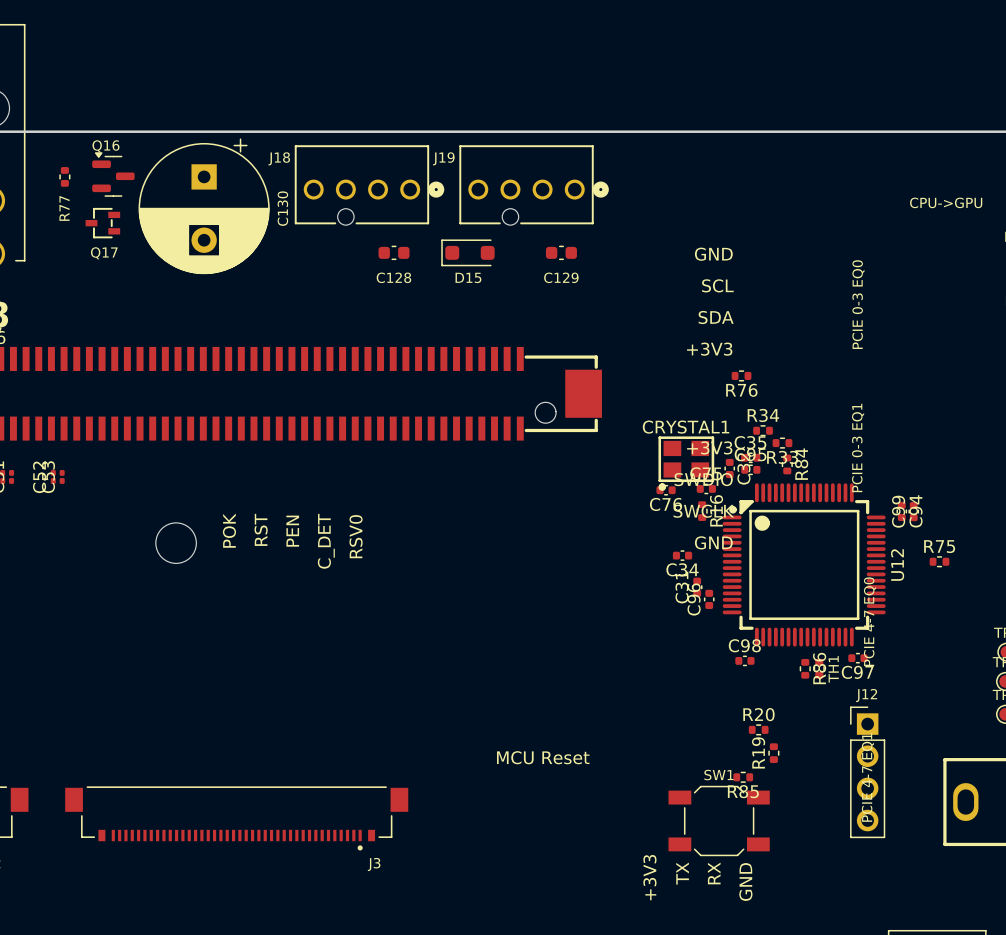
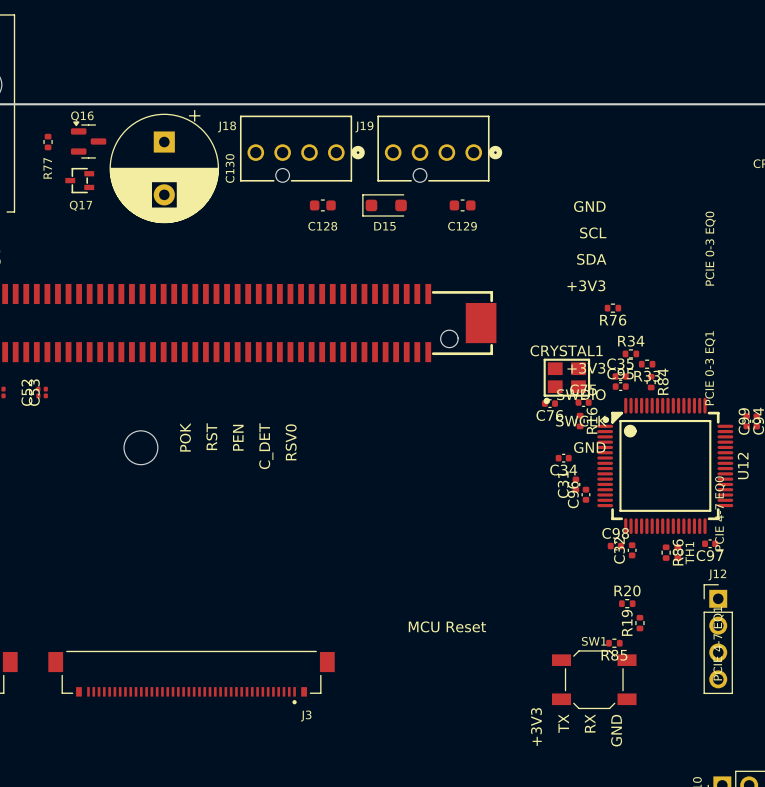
C32 position: (729, 468) -> (632, 550)
C32 name position: C32 (743, 468) -> C32 (619, 550)

